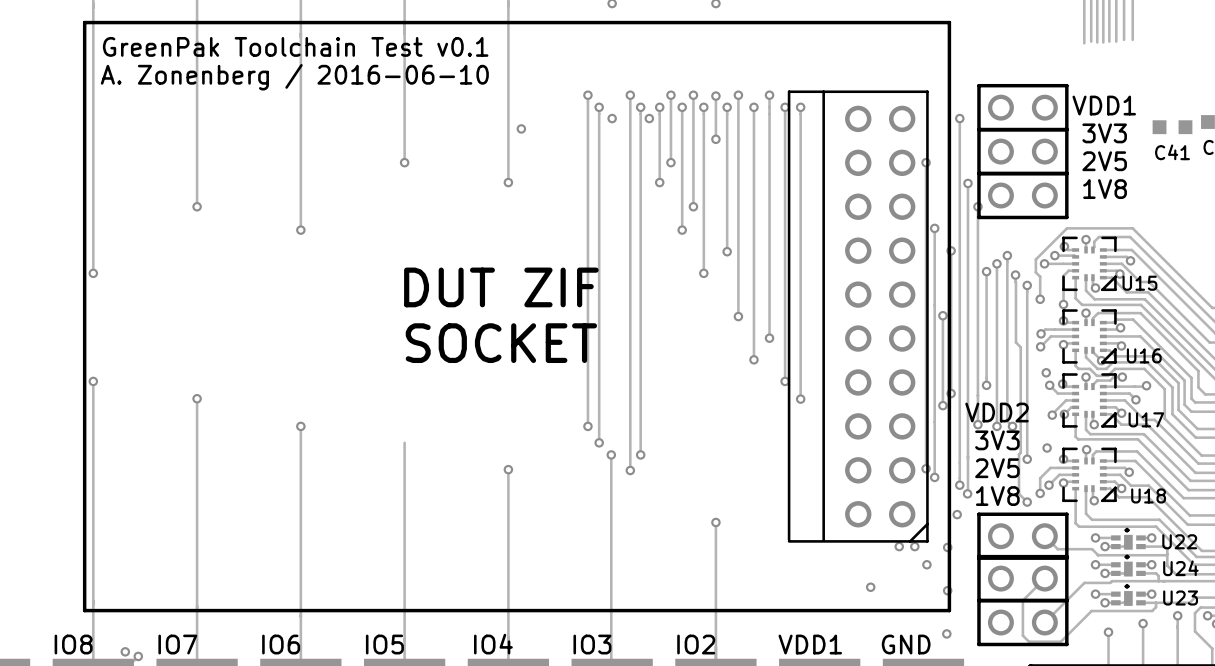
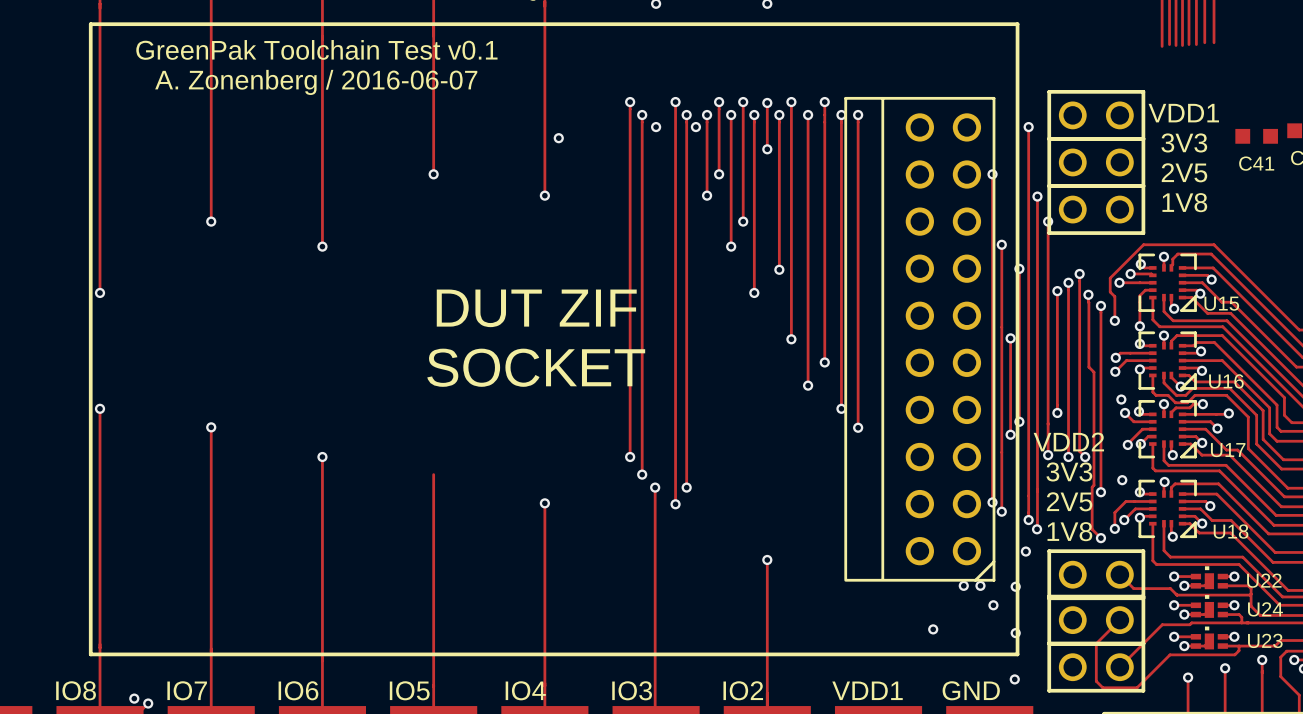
text: A. Zonenberg / 2016-06-10 (294, 77) -> A. Zonenberg / 2016-06-07 (316, 82)

